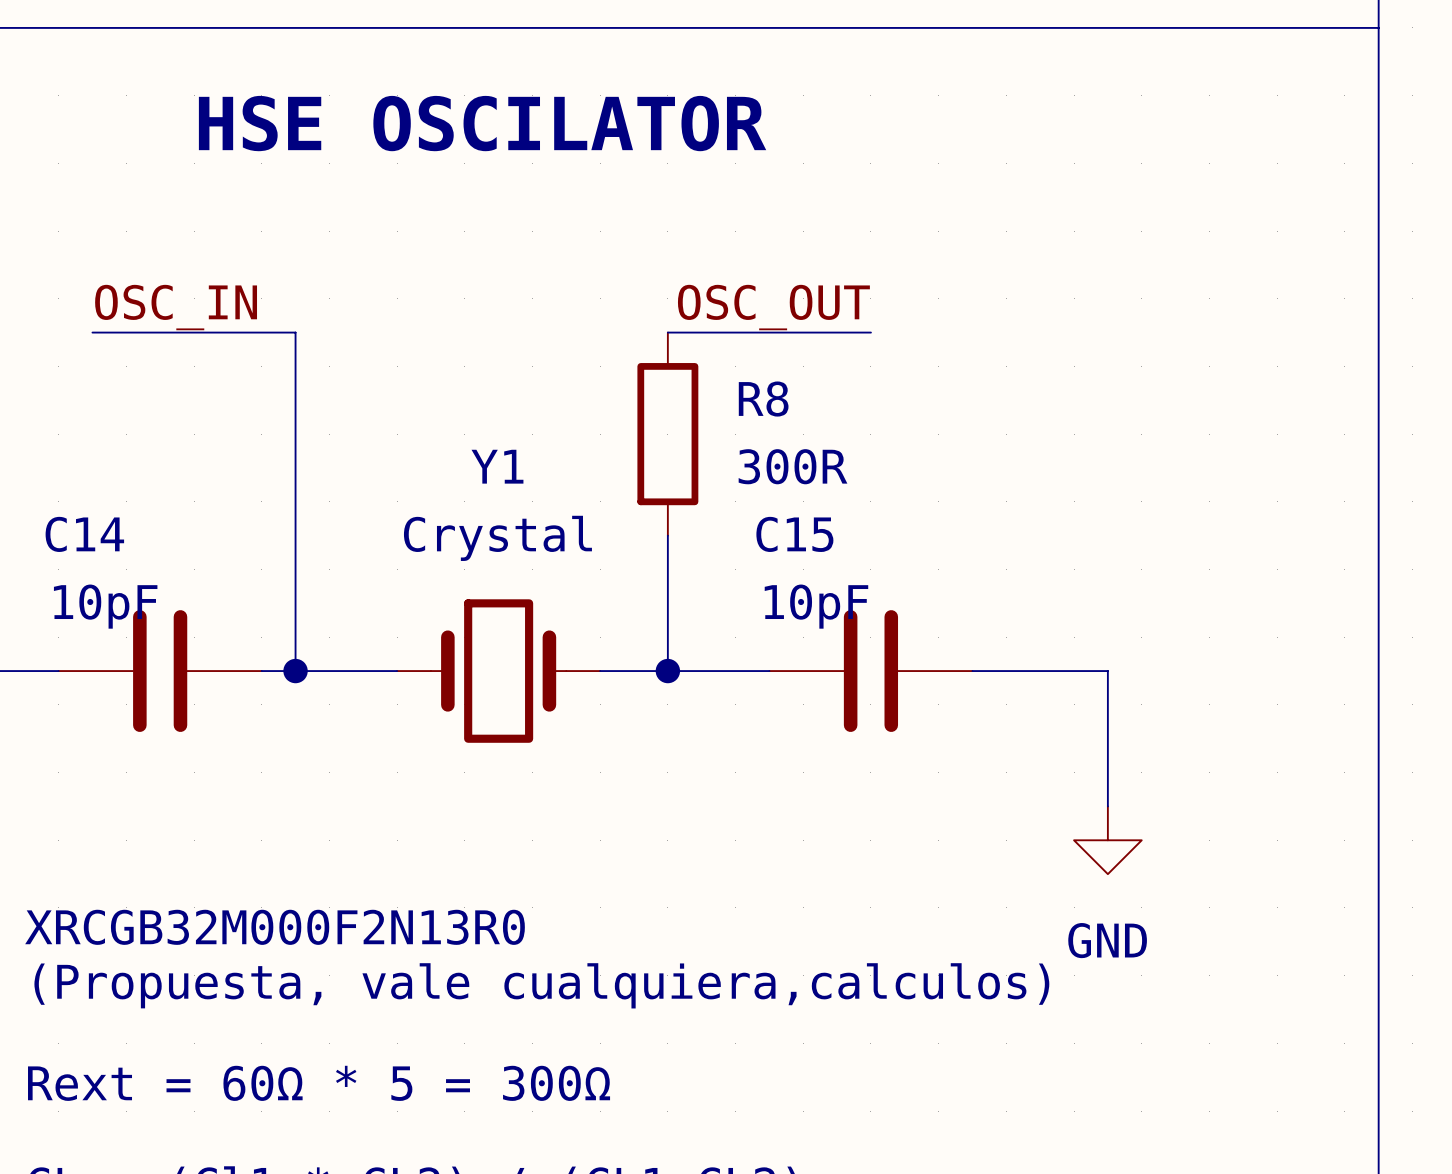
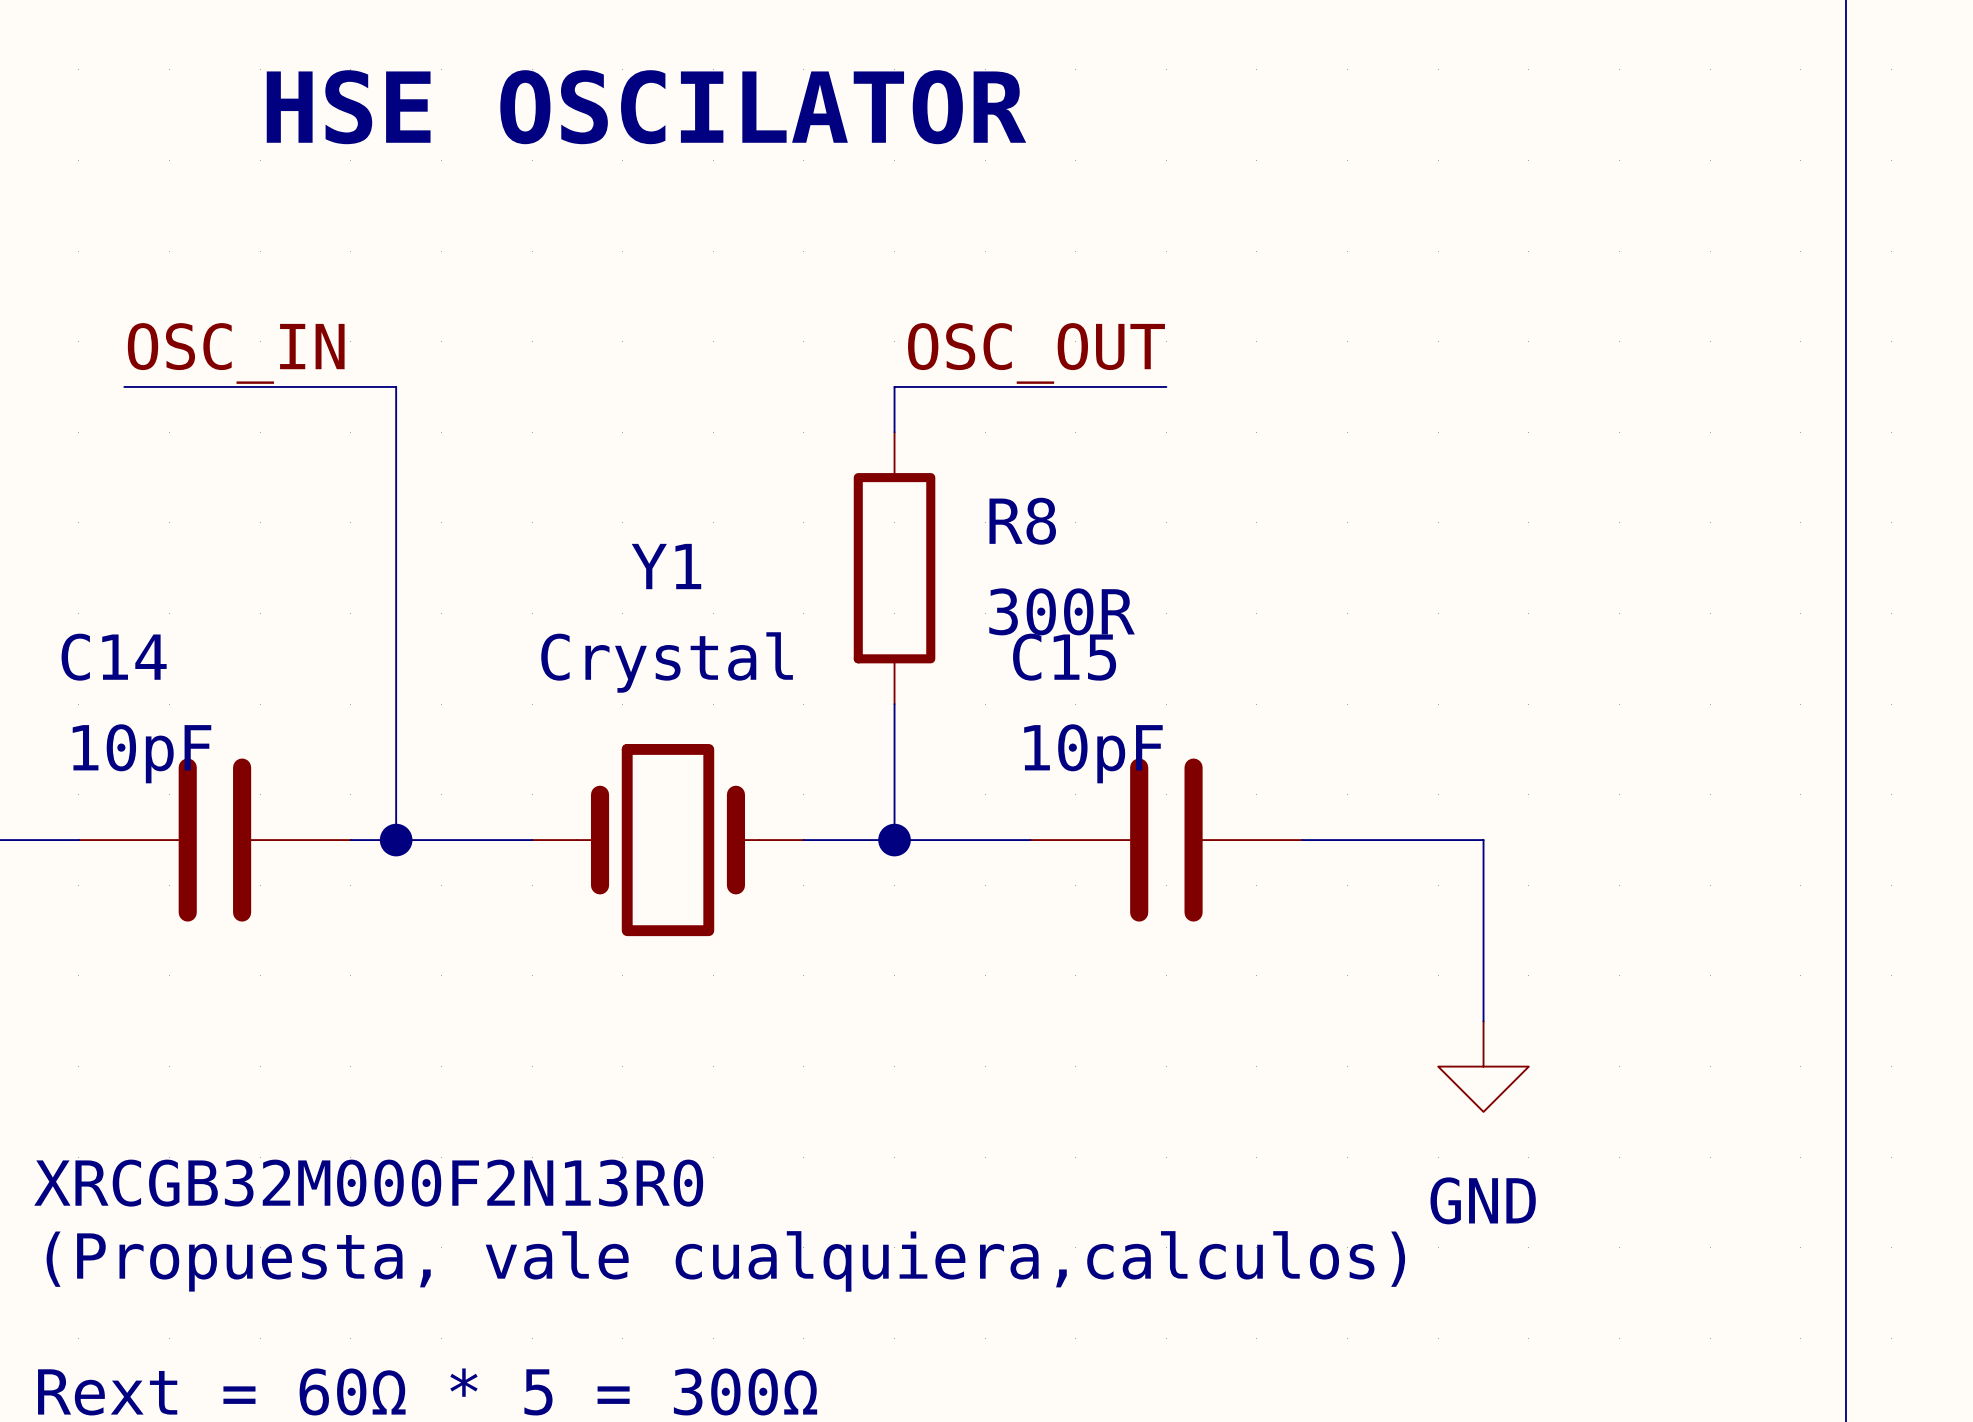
R8 position: (667, 434) -> (894, 568)

